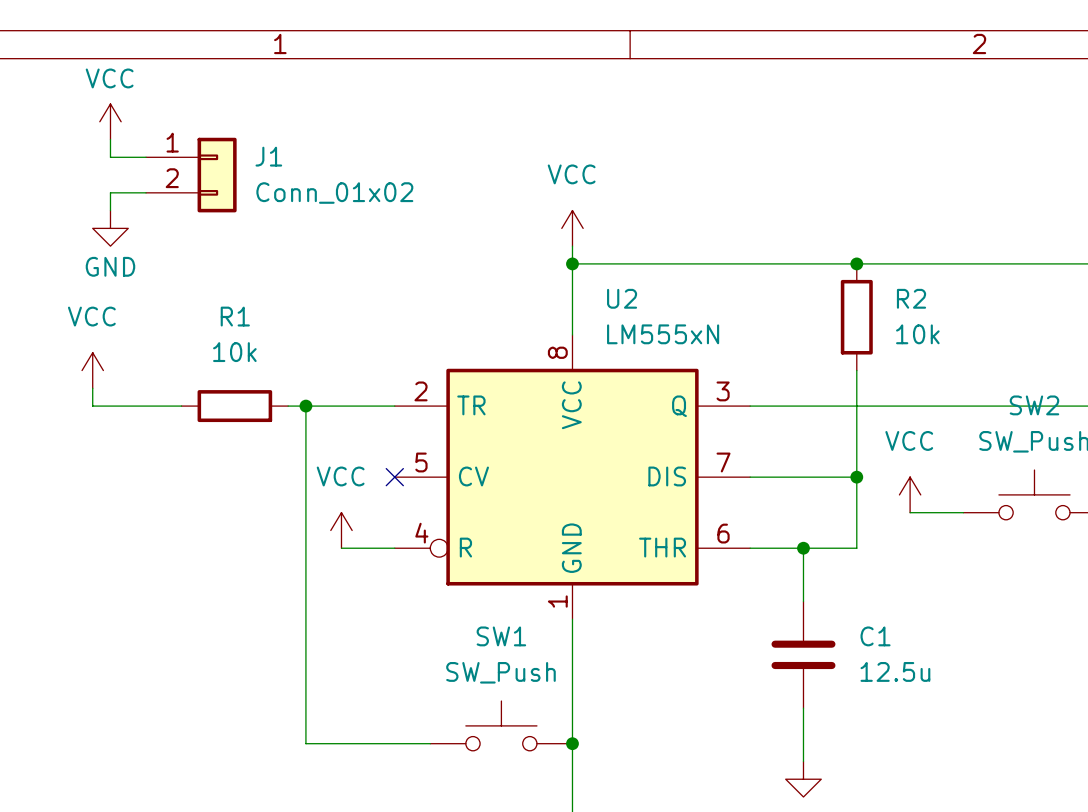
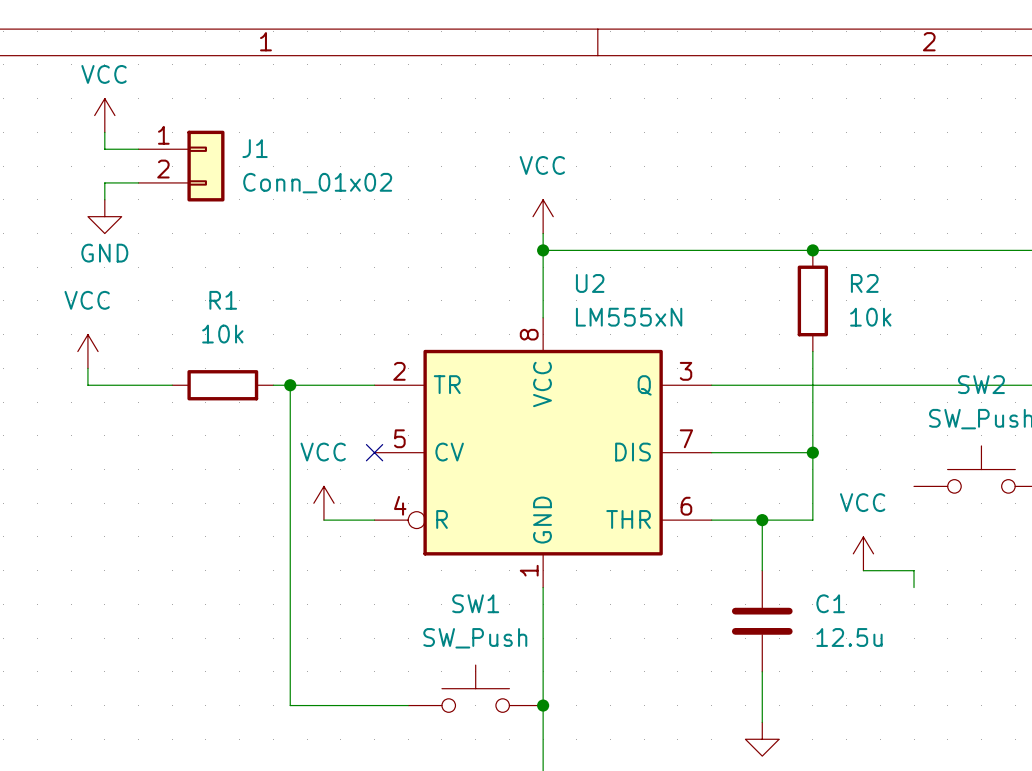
power symbol position: VCC (910, 494) -> VCC (863, 553)
wire: (910, 512) (963, 512) -> none
wire: none -> (863, 570) (914, 570) (914, 587)

